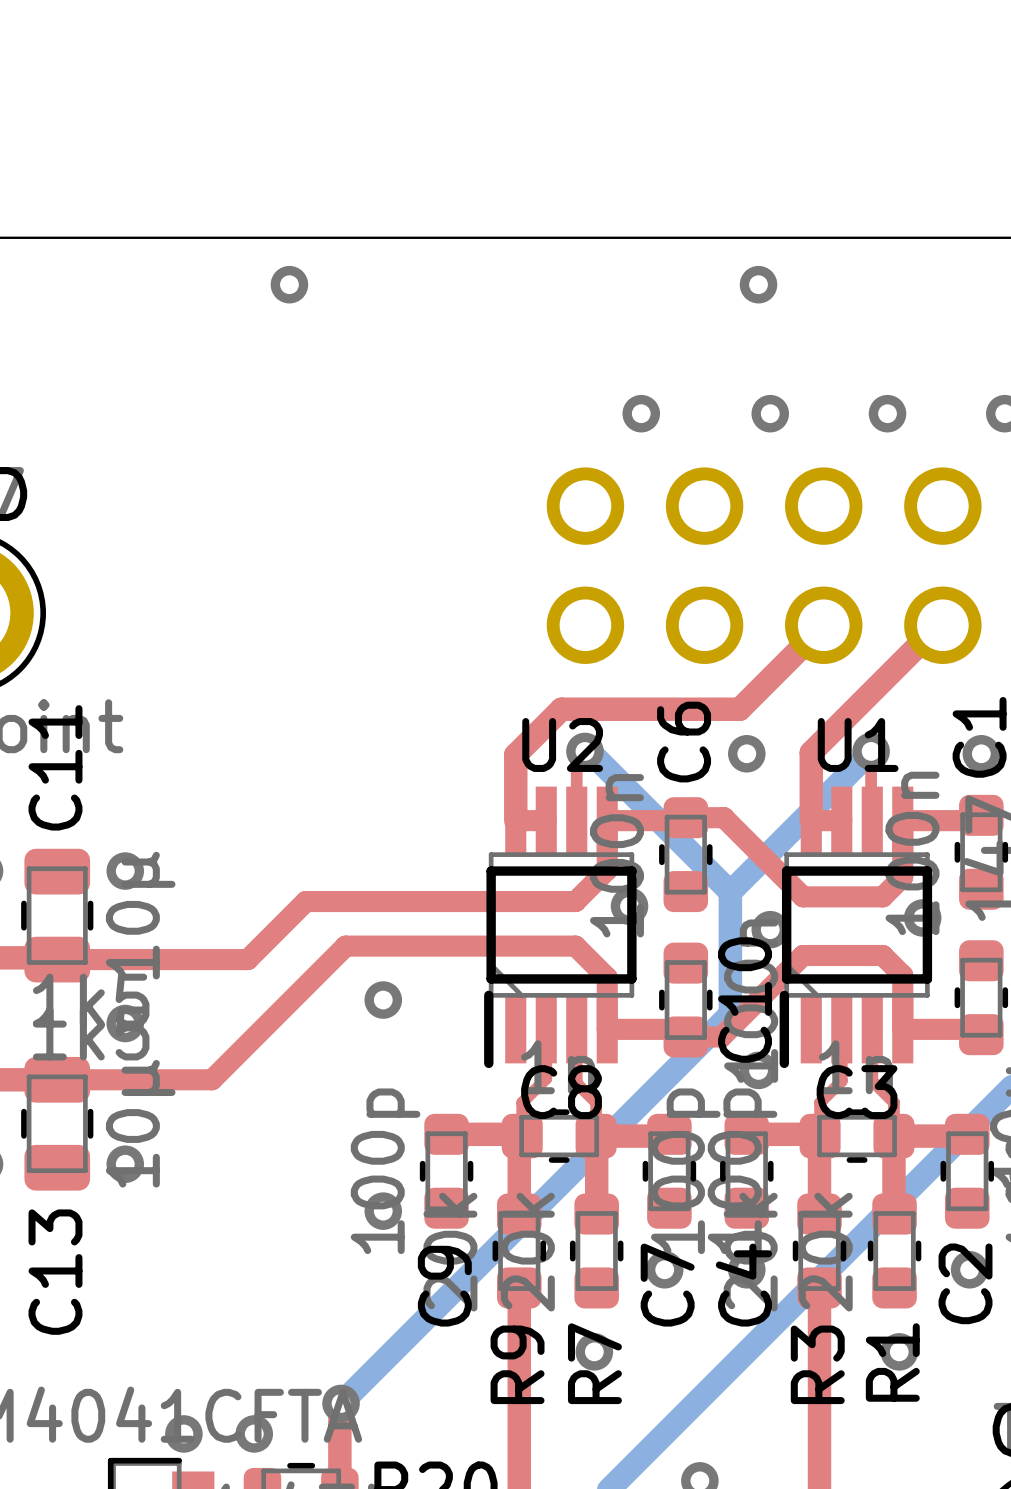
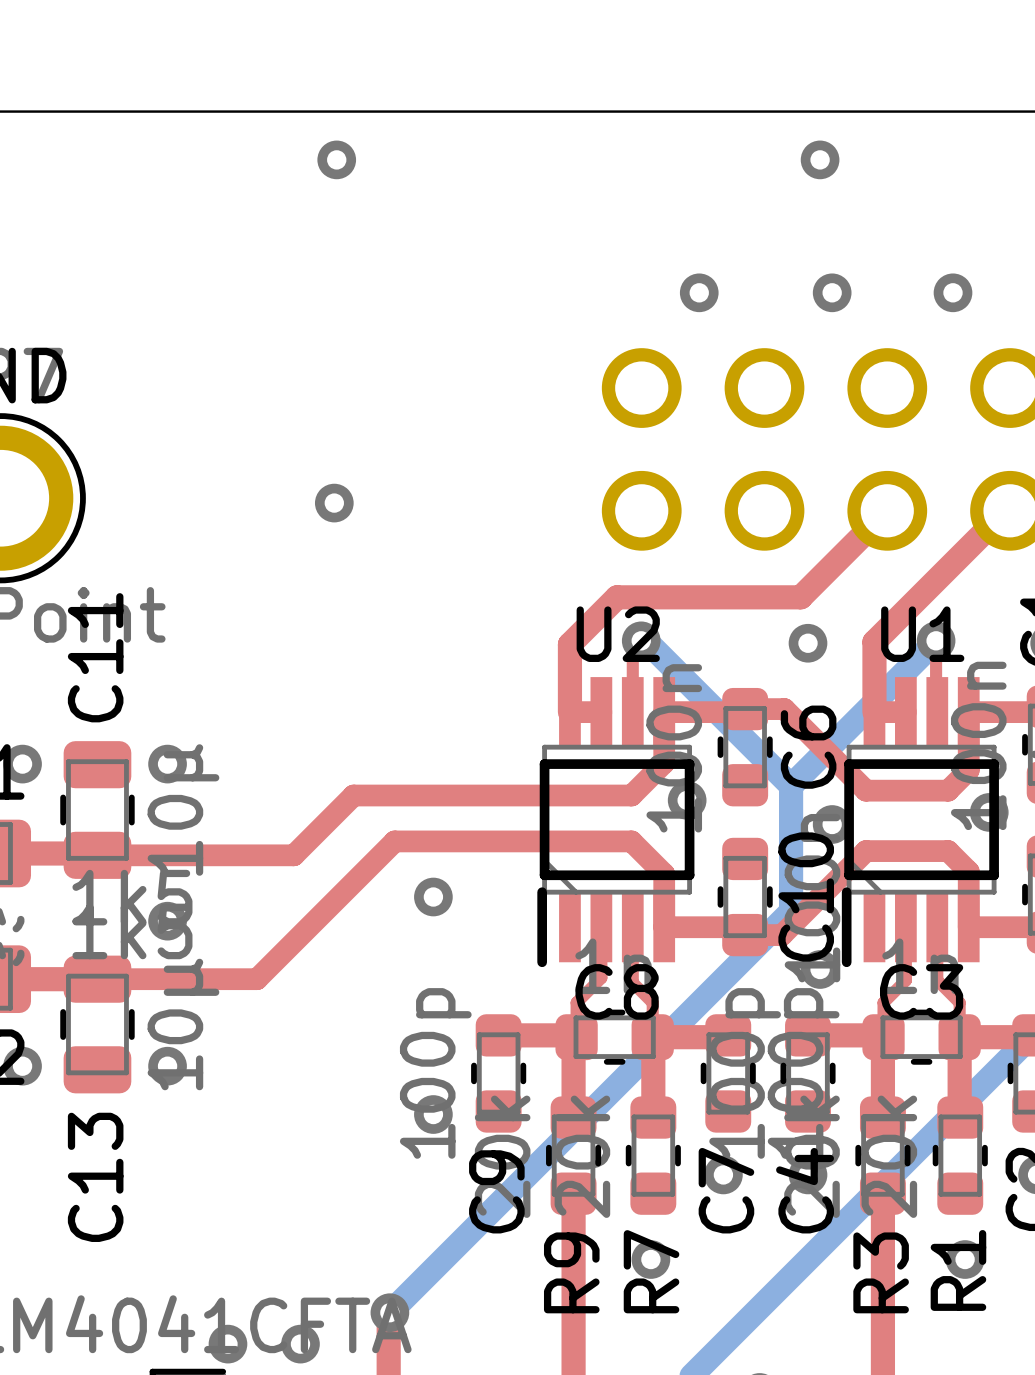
via: none -> (334, 503)
C6 name position: C6 (684, 742) -> C6 (808, 747)

